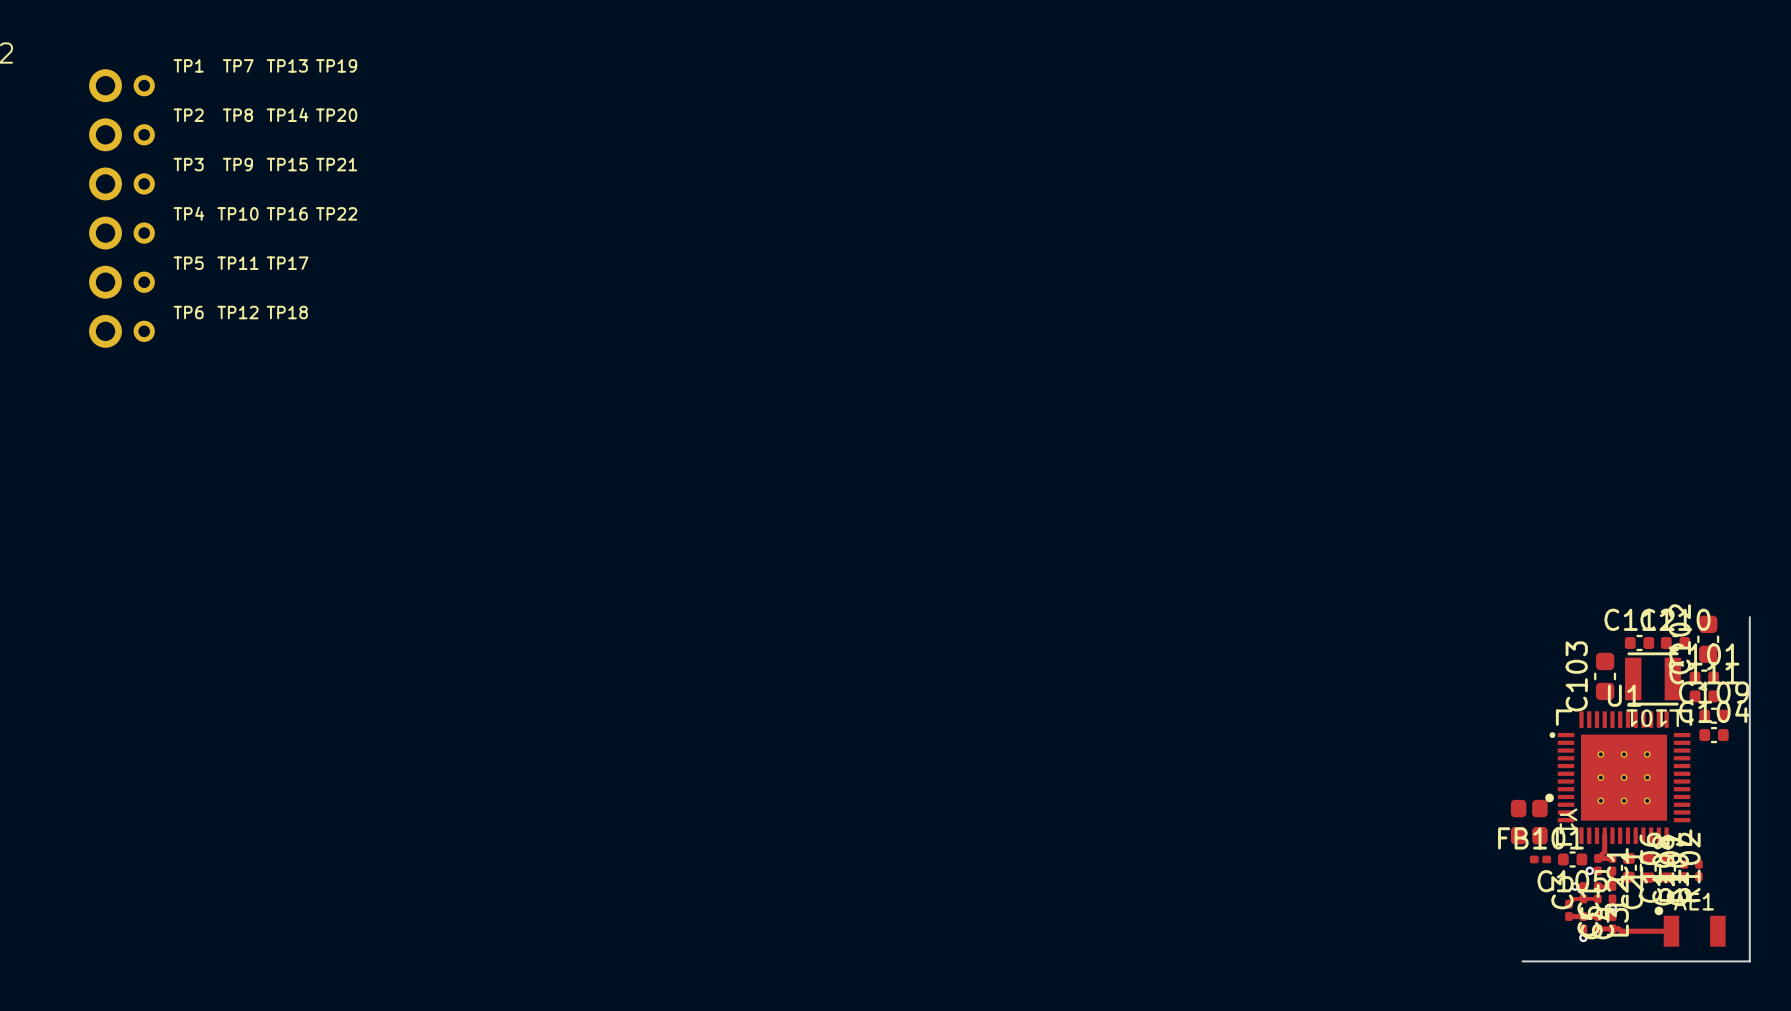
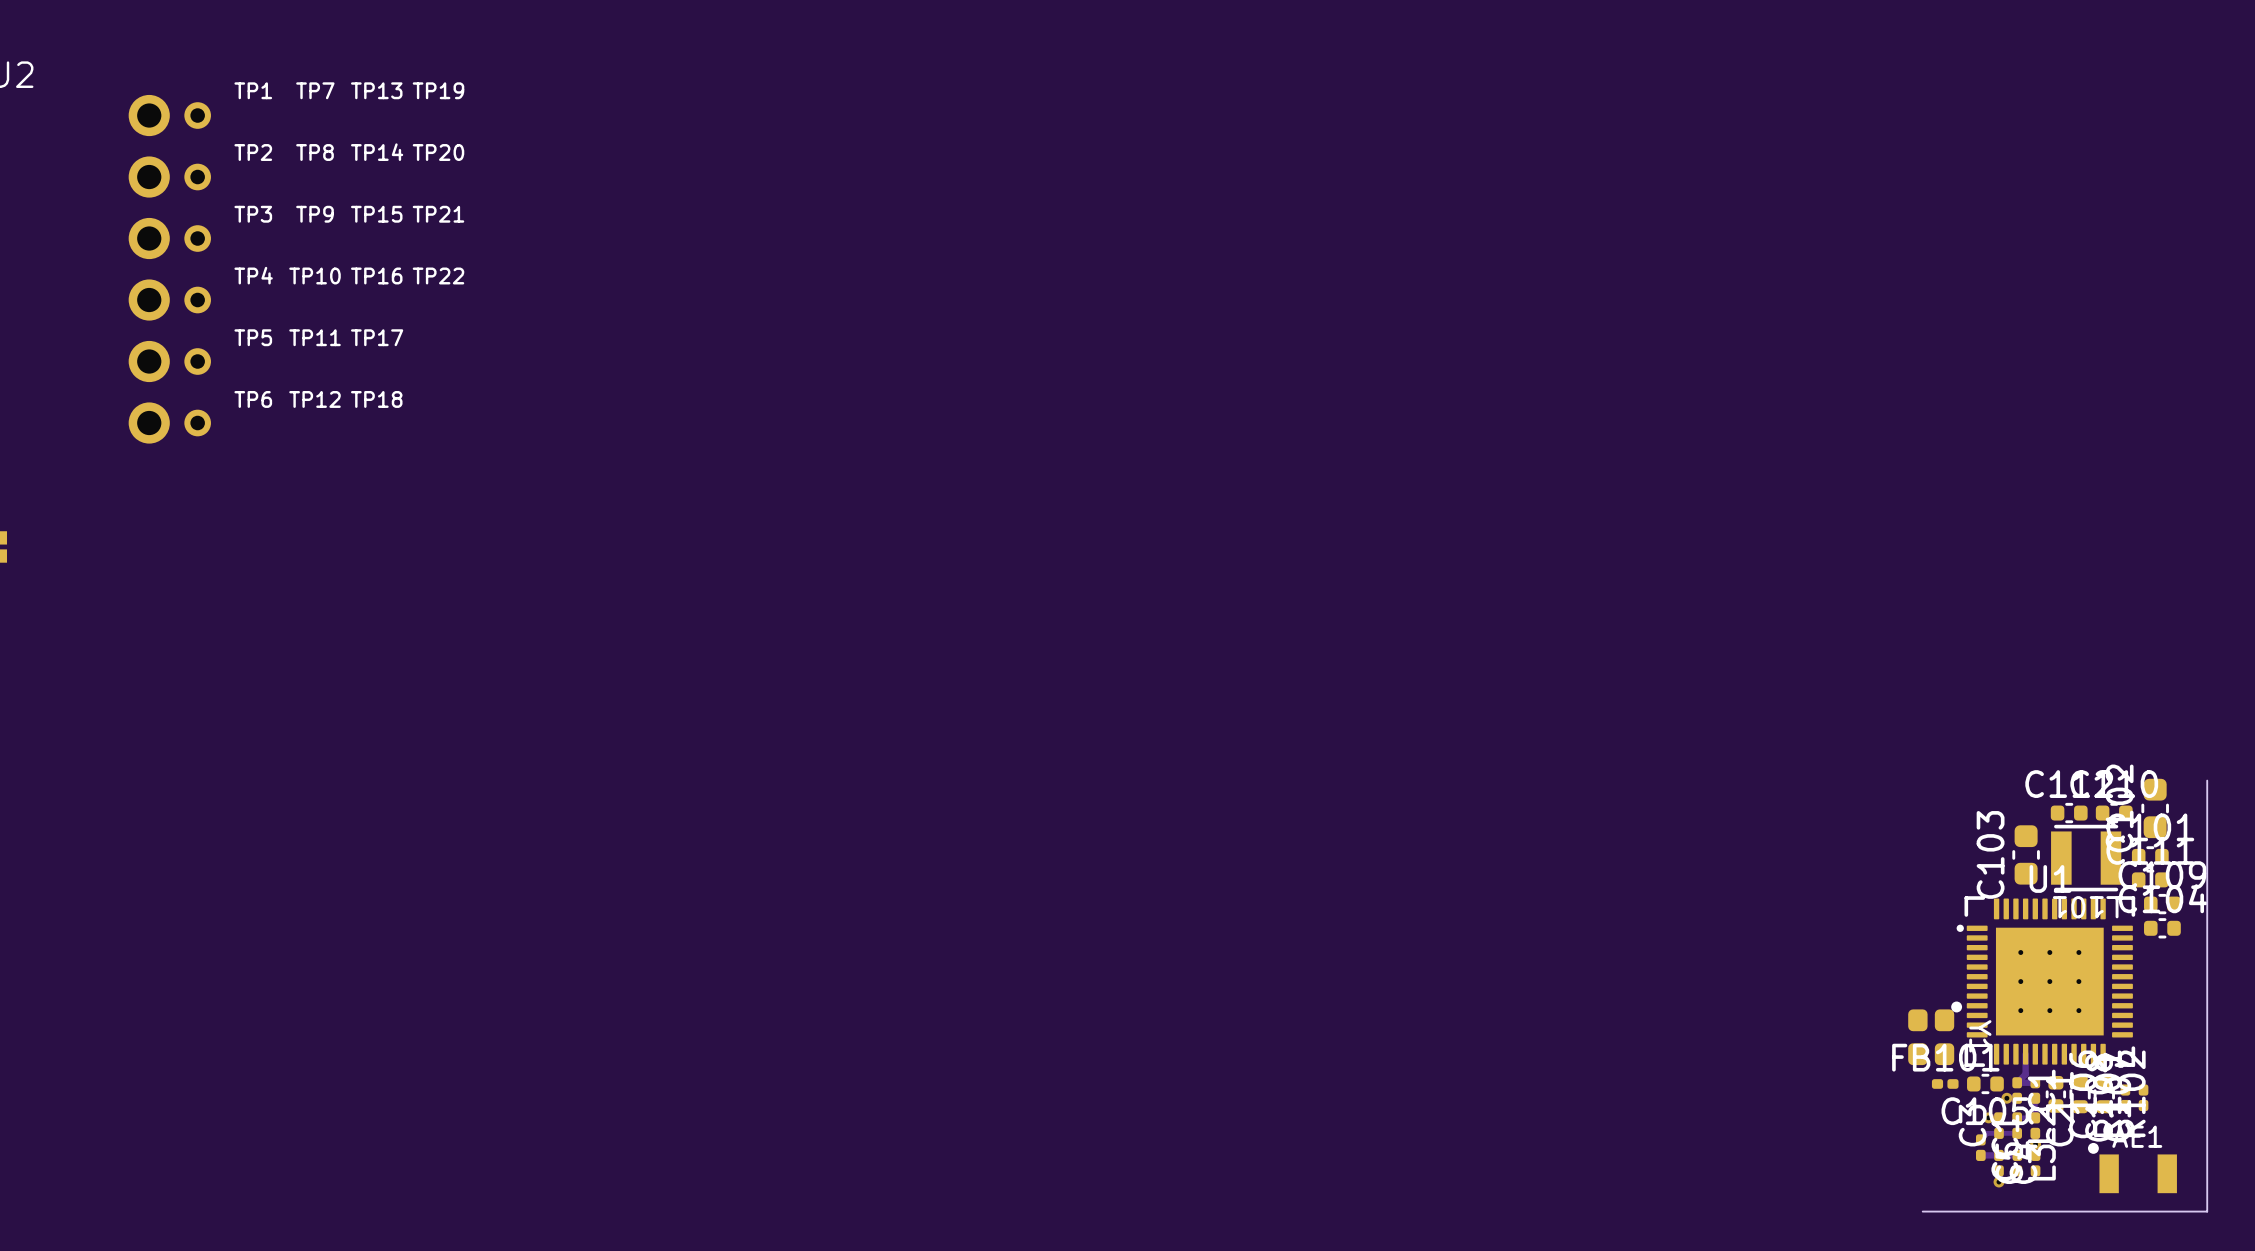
track: (1598, 928) (1618, 928) (1620, 931) (1671, 931) -> none

